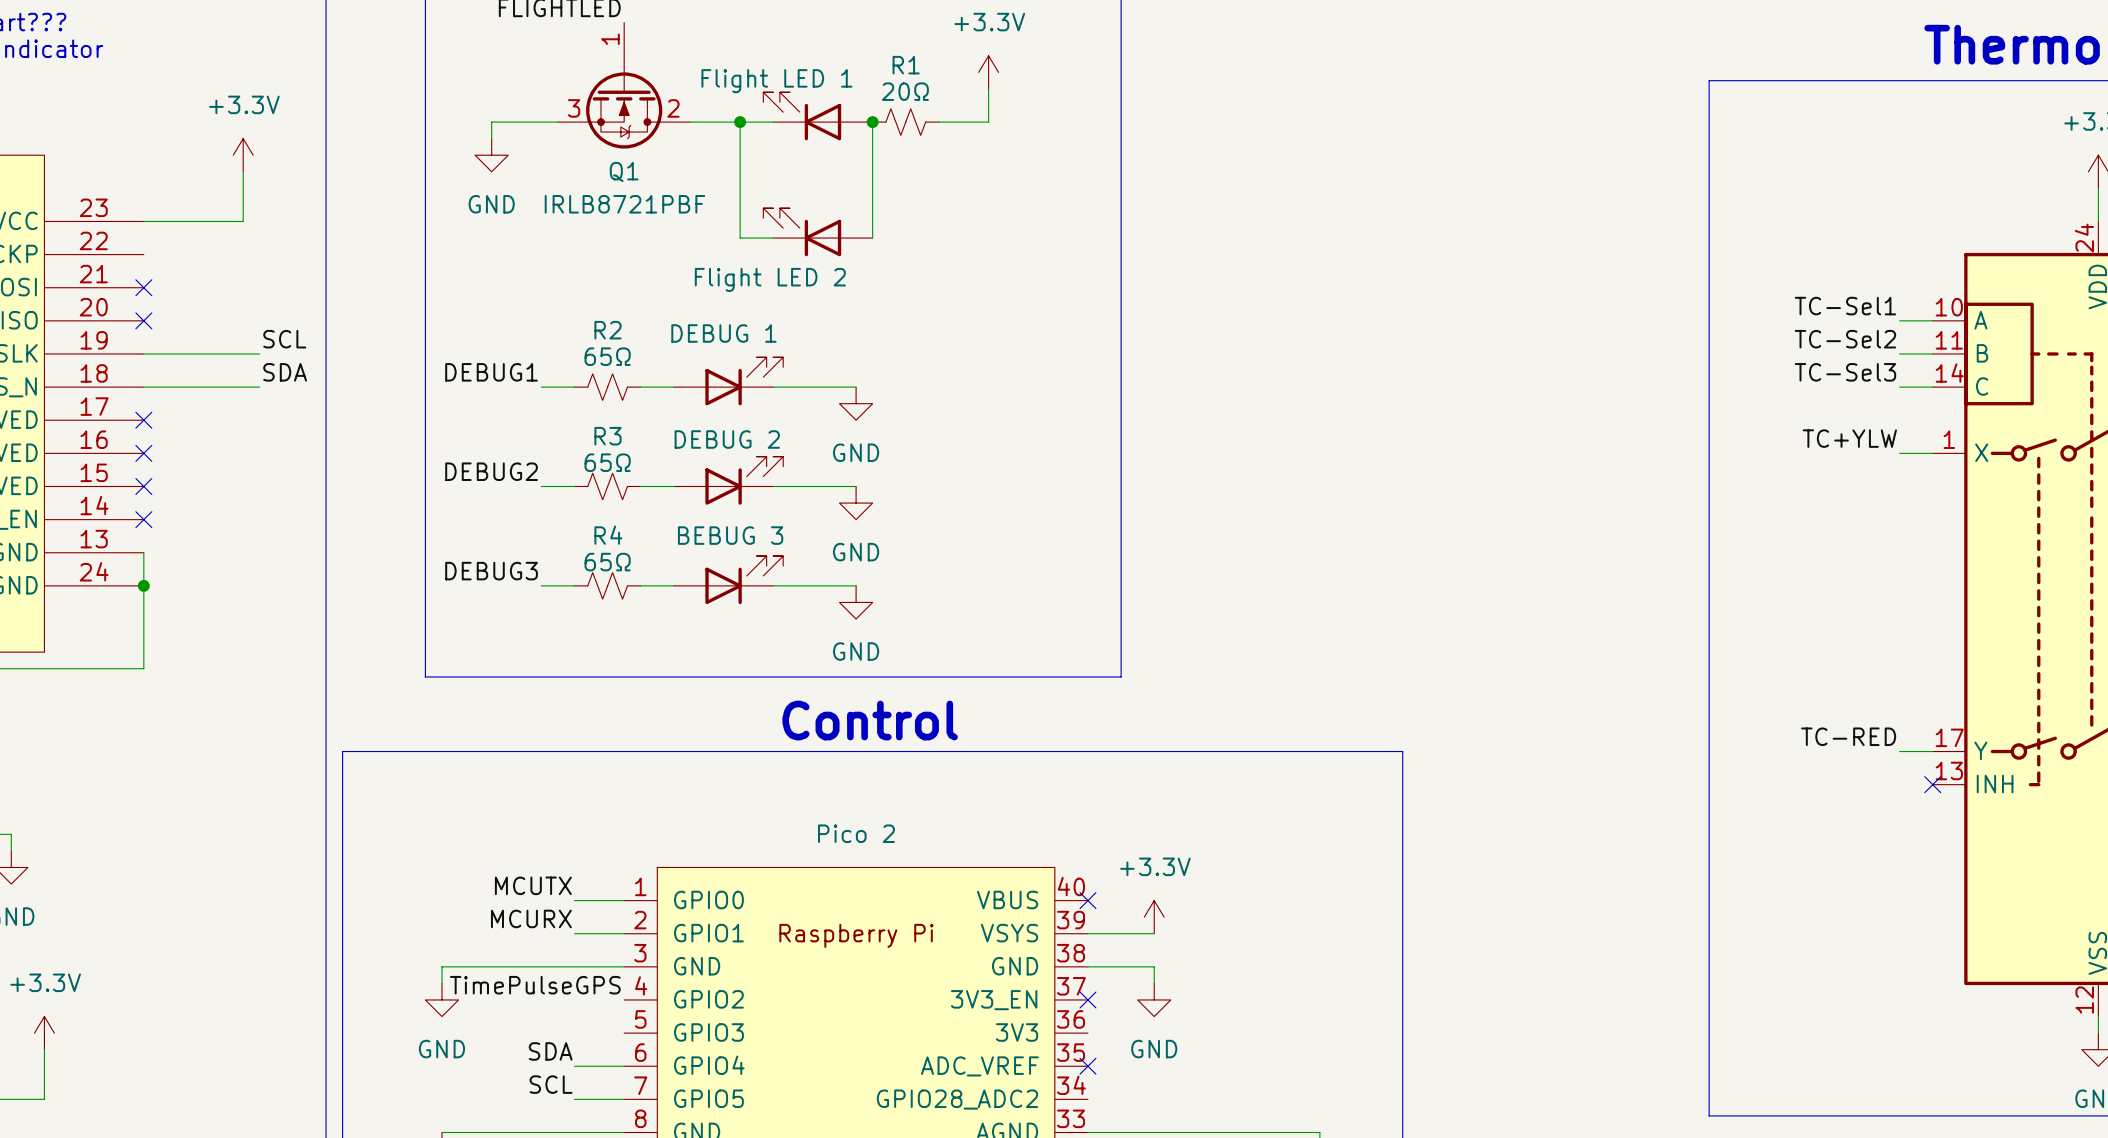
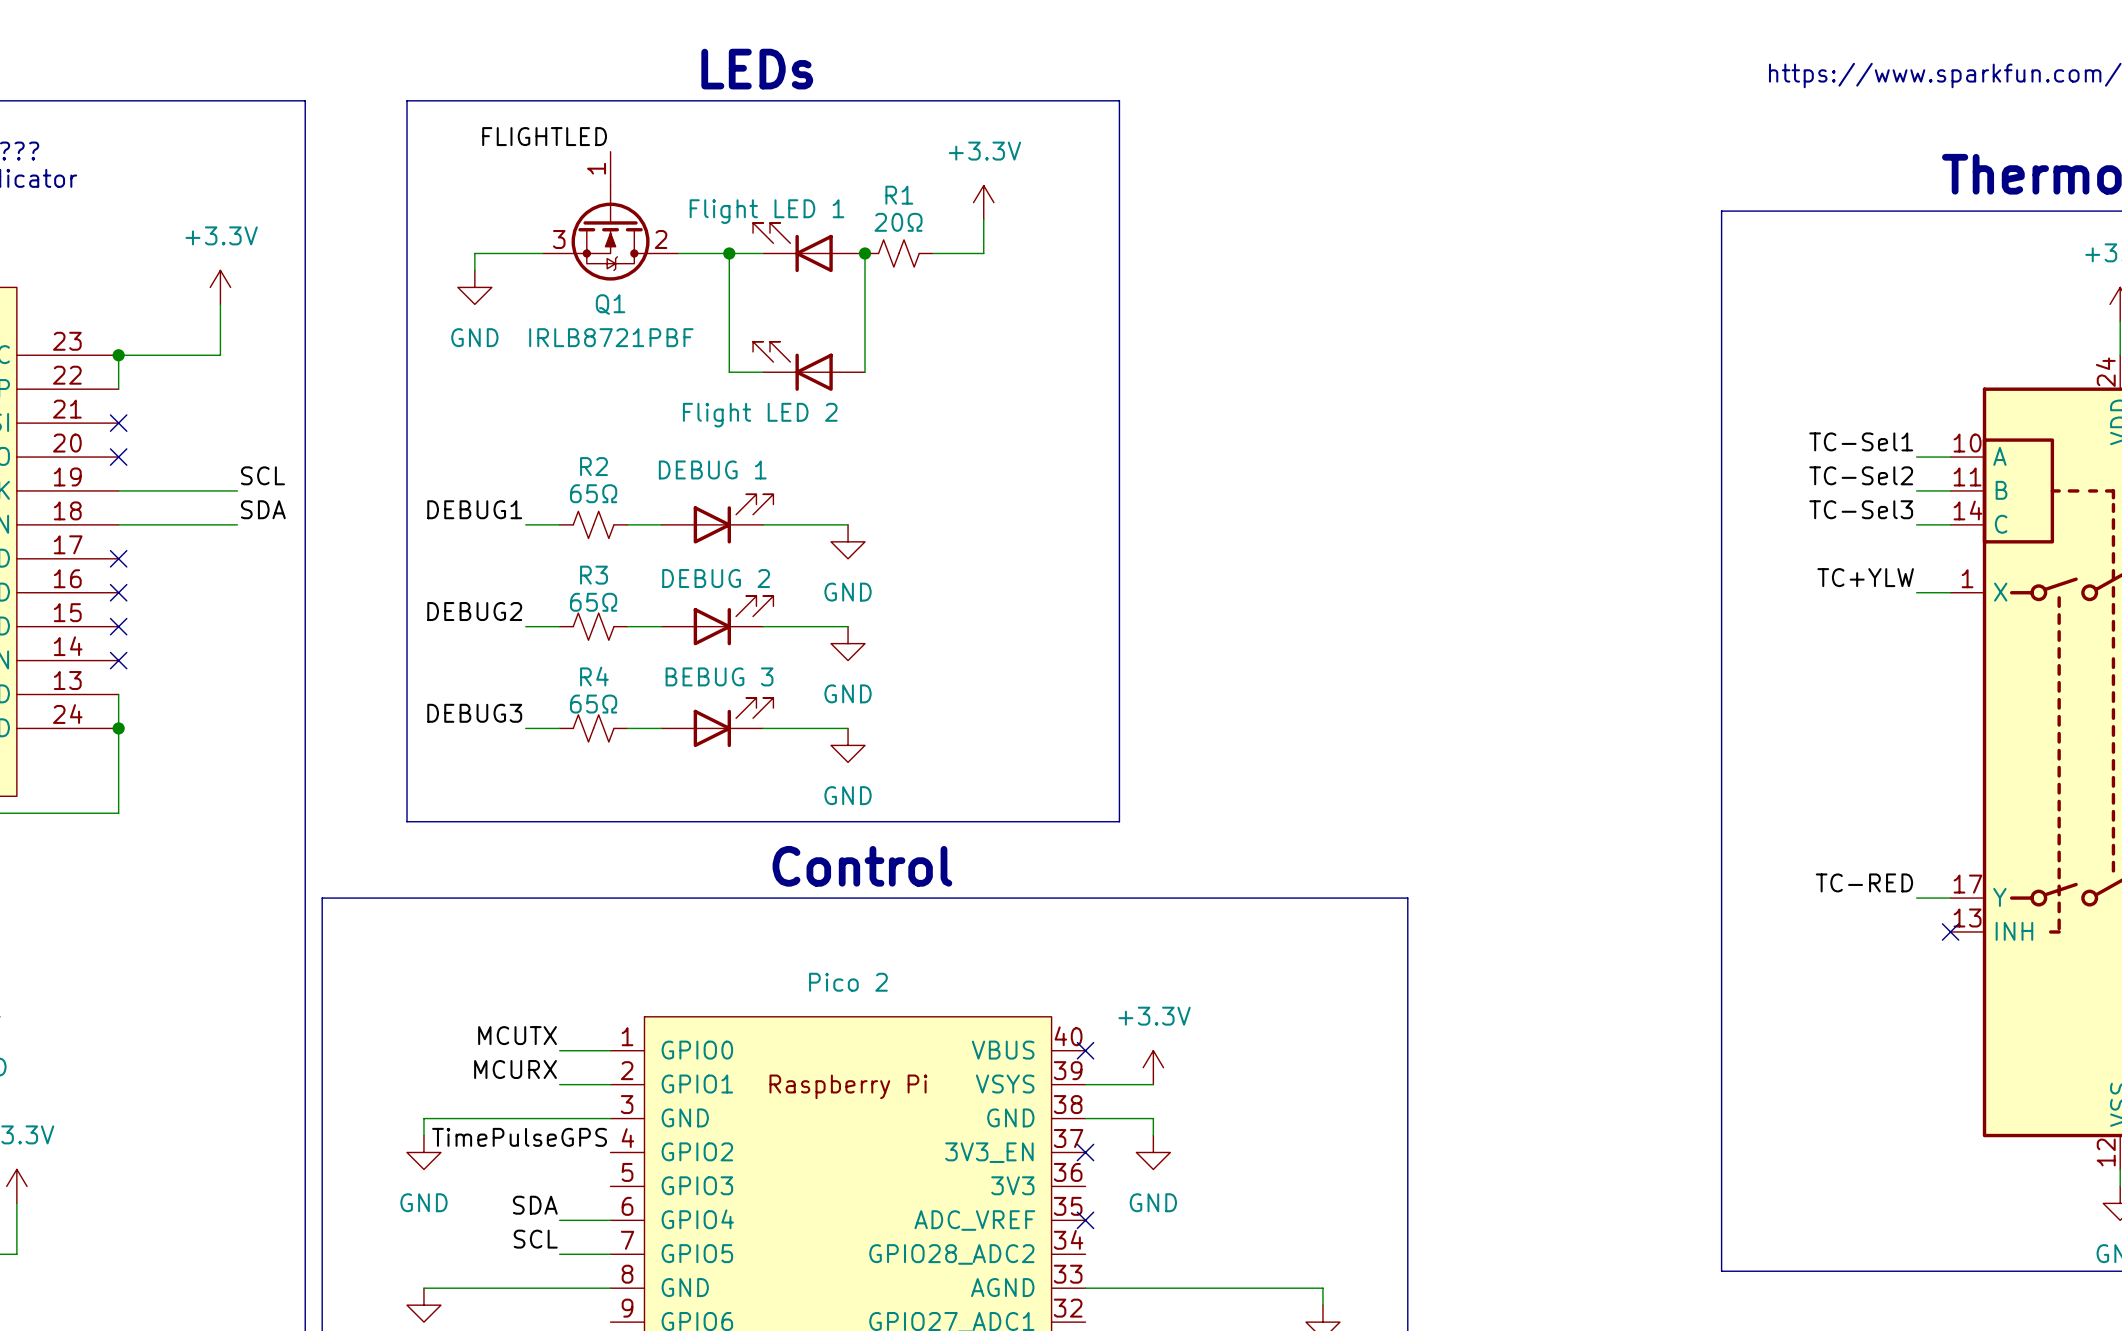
wire: none -> (118, 355) (118, 389)
junction: none -> (118, 355)

